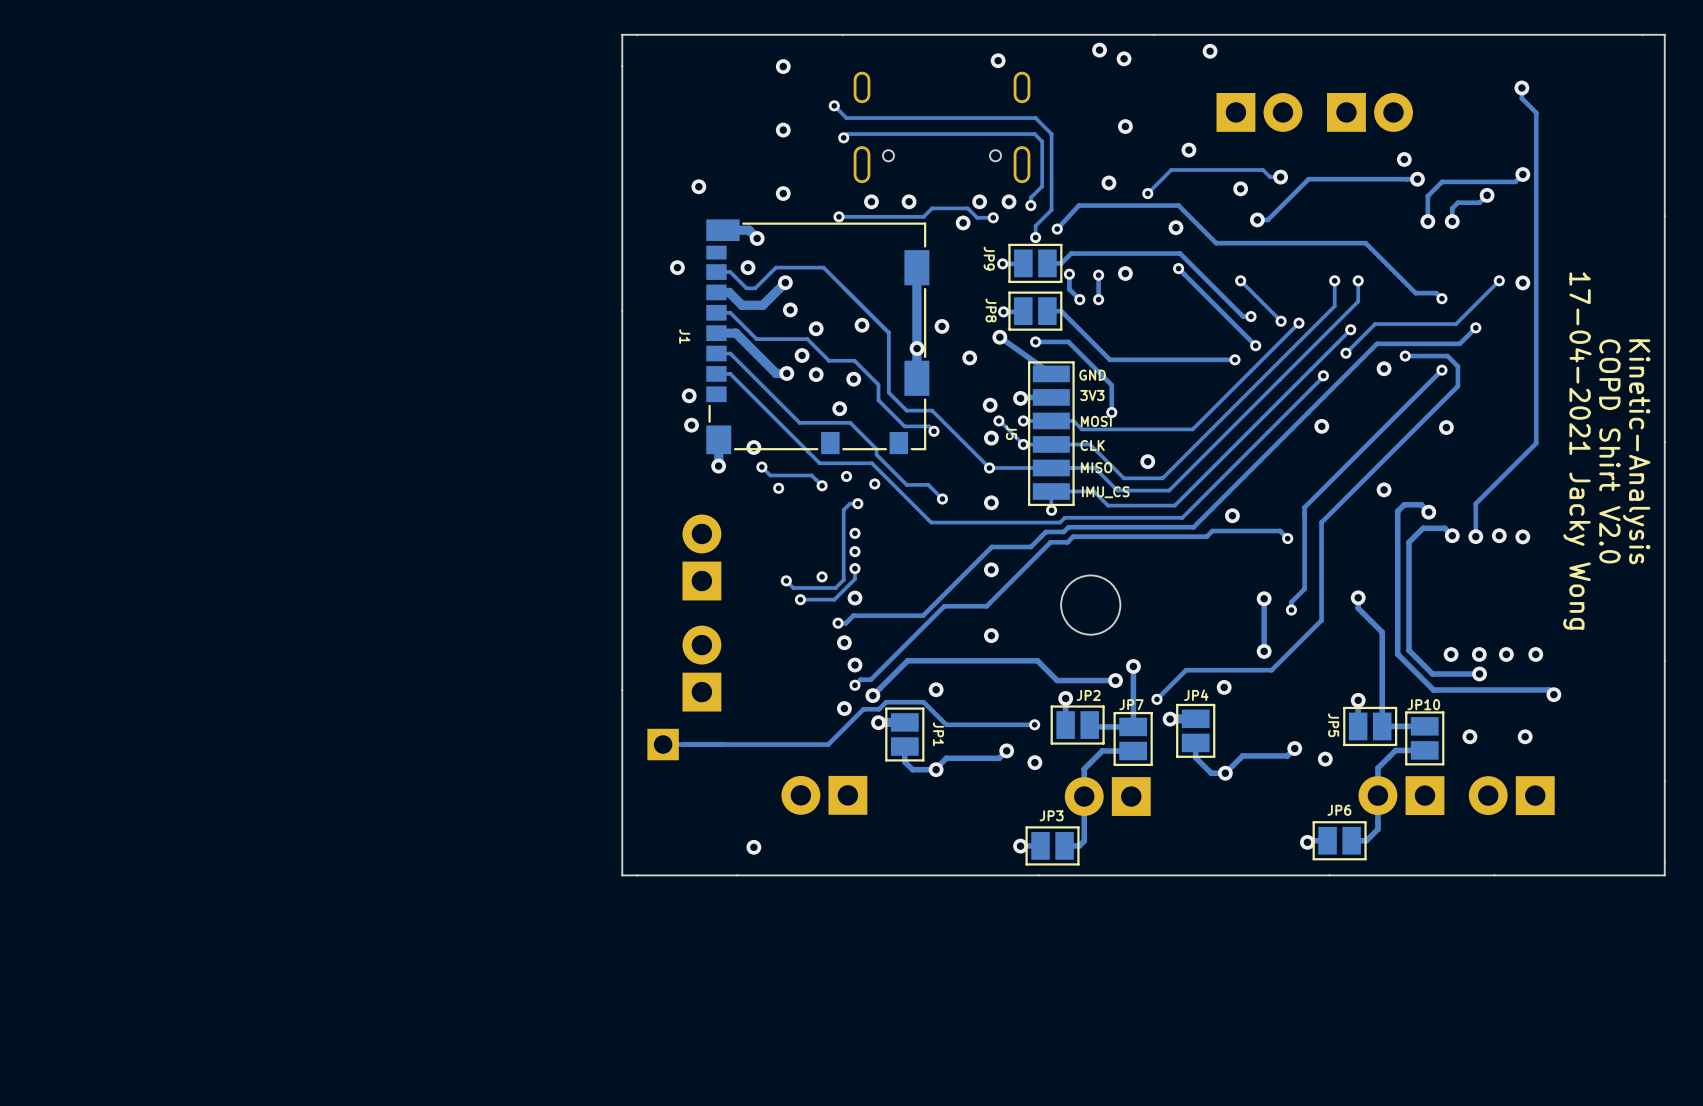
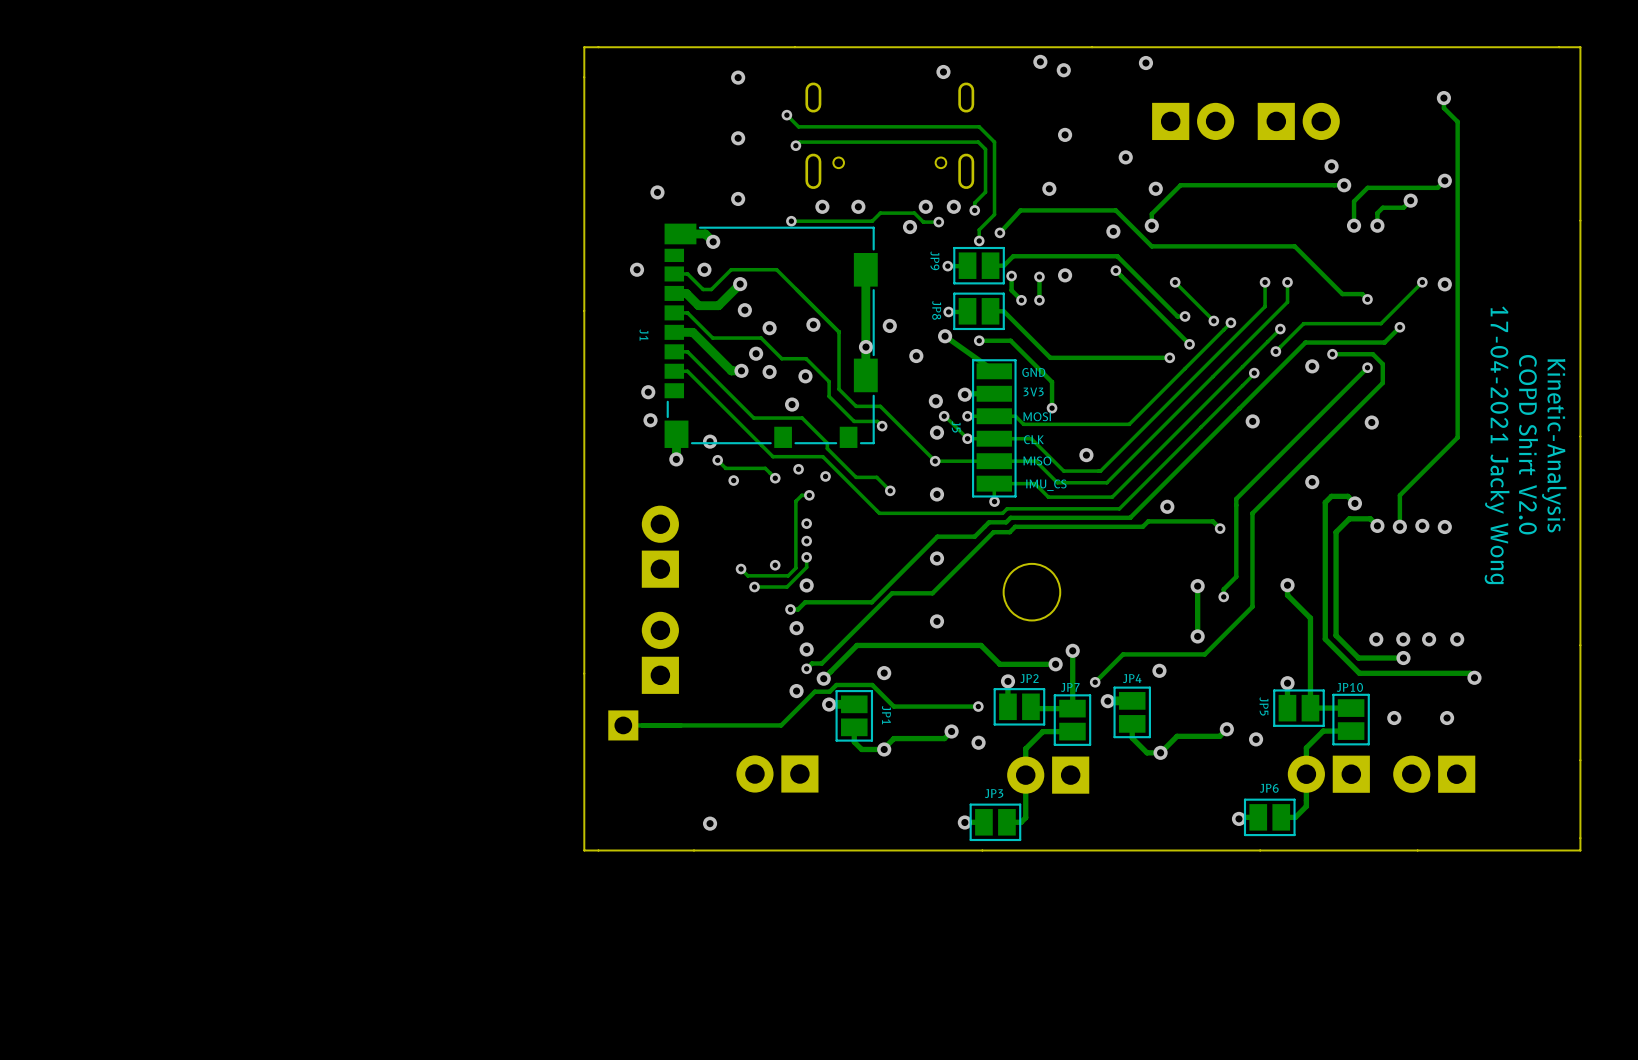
track: (1280, 177) (1270, 177) (1263, 170) (1171, 170) (1147, 193) -> none
via: (1280, 177) -> none
track: (1308, 179) (1267, 219) (1257, 219) -> (1240, 185) (1180, 185) (1151, 214) (1151, 225)
via: none -> (1155, 188)
via: (1240, 188) -> none
via: (1147, 193) -> none
via: (1257, 219) -> none
via: none -> (1151, 225)

